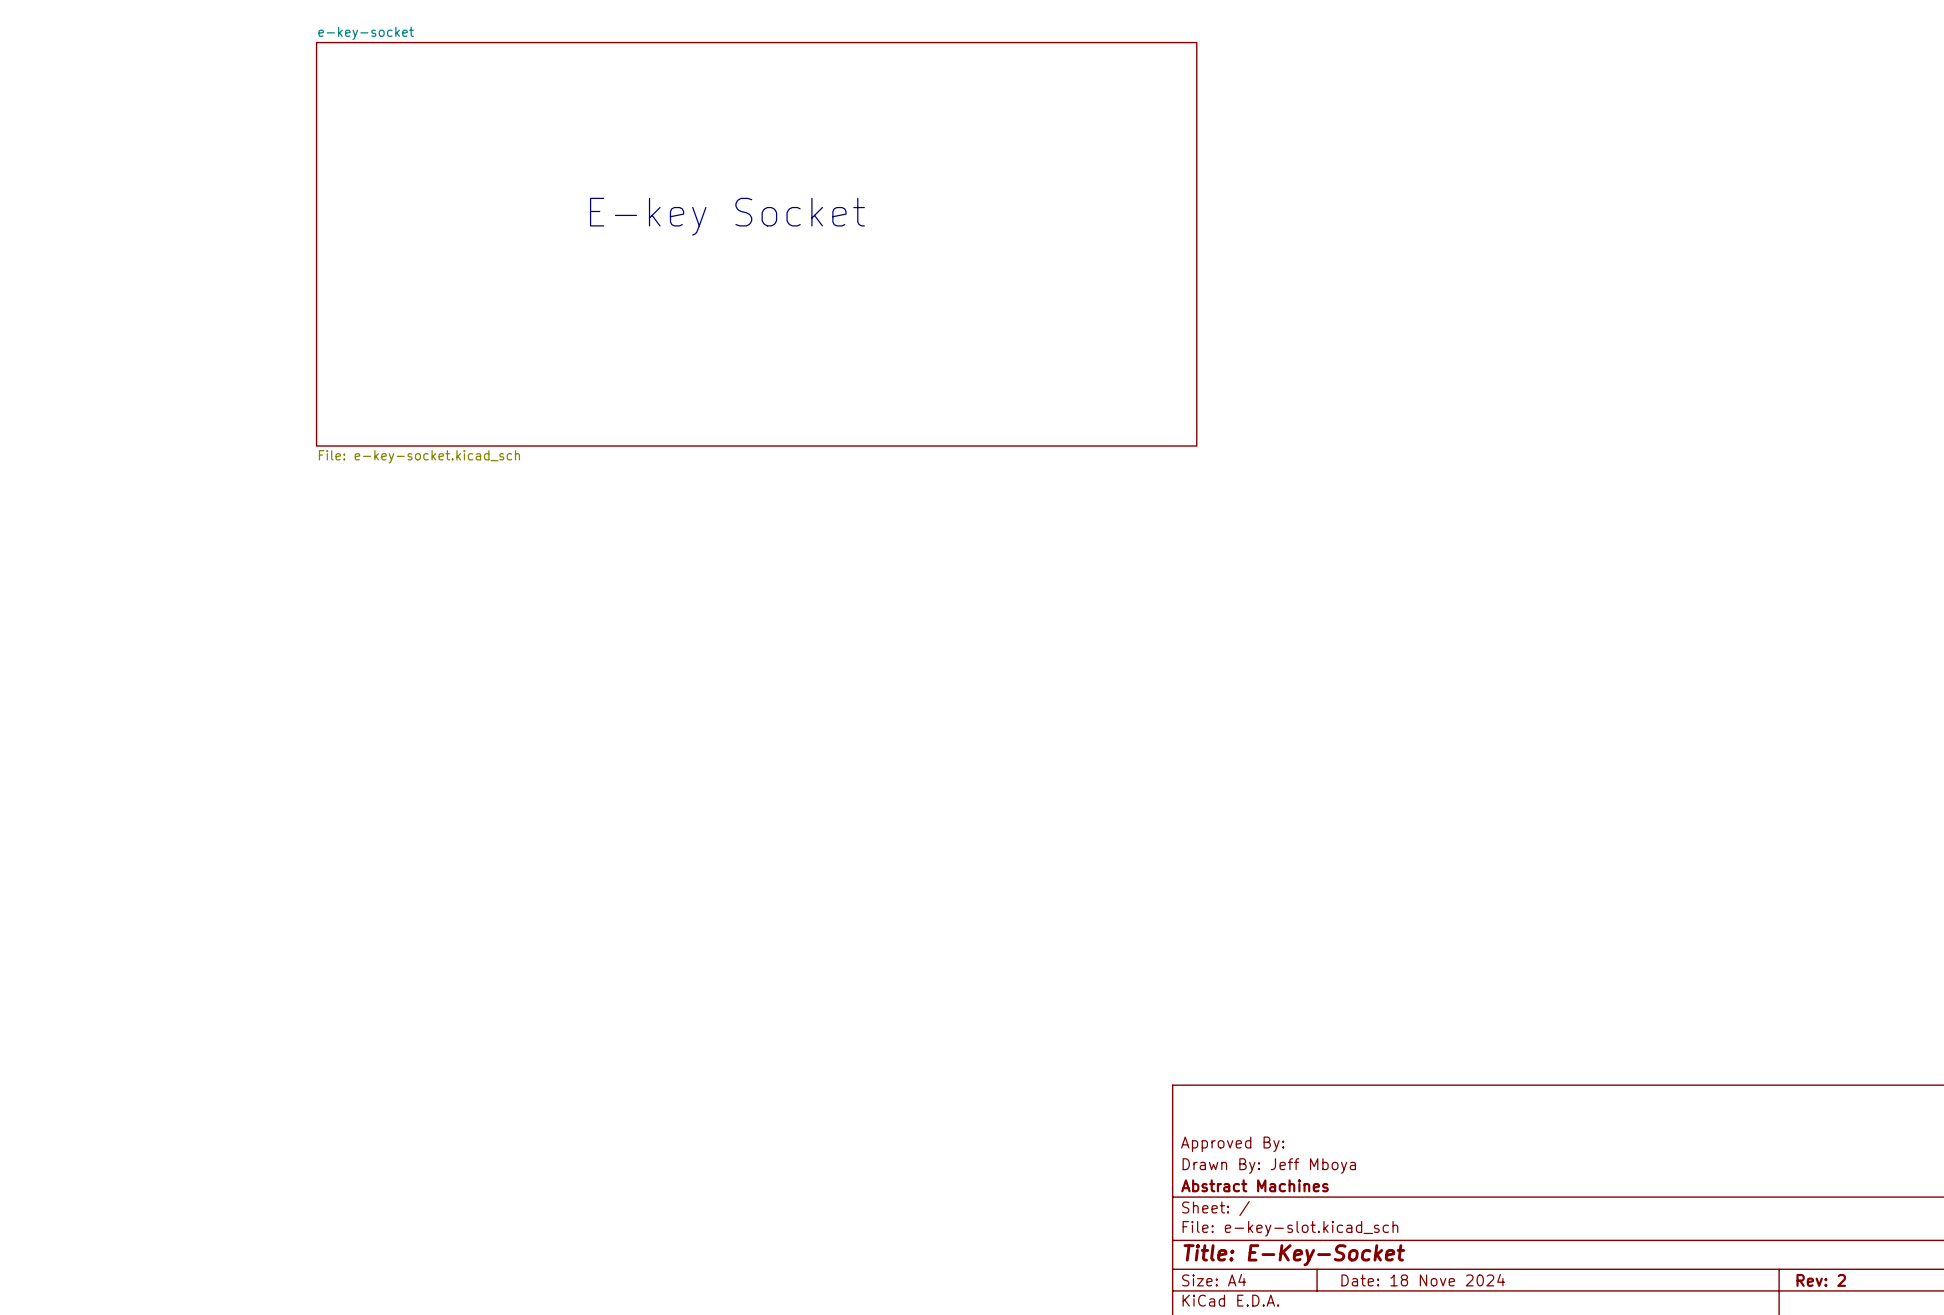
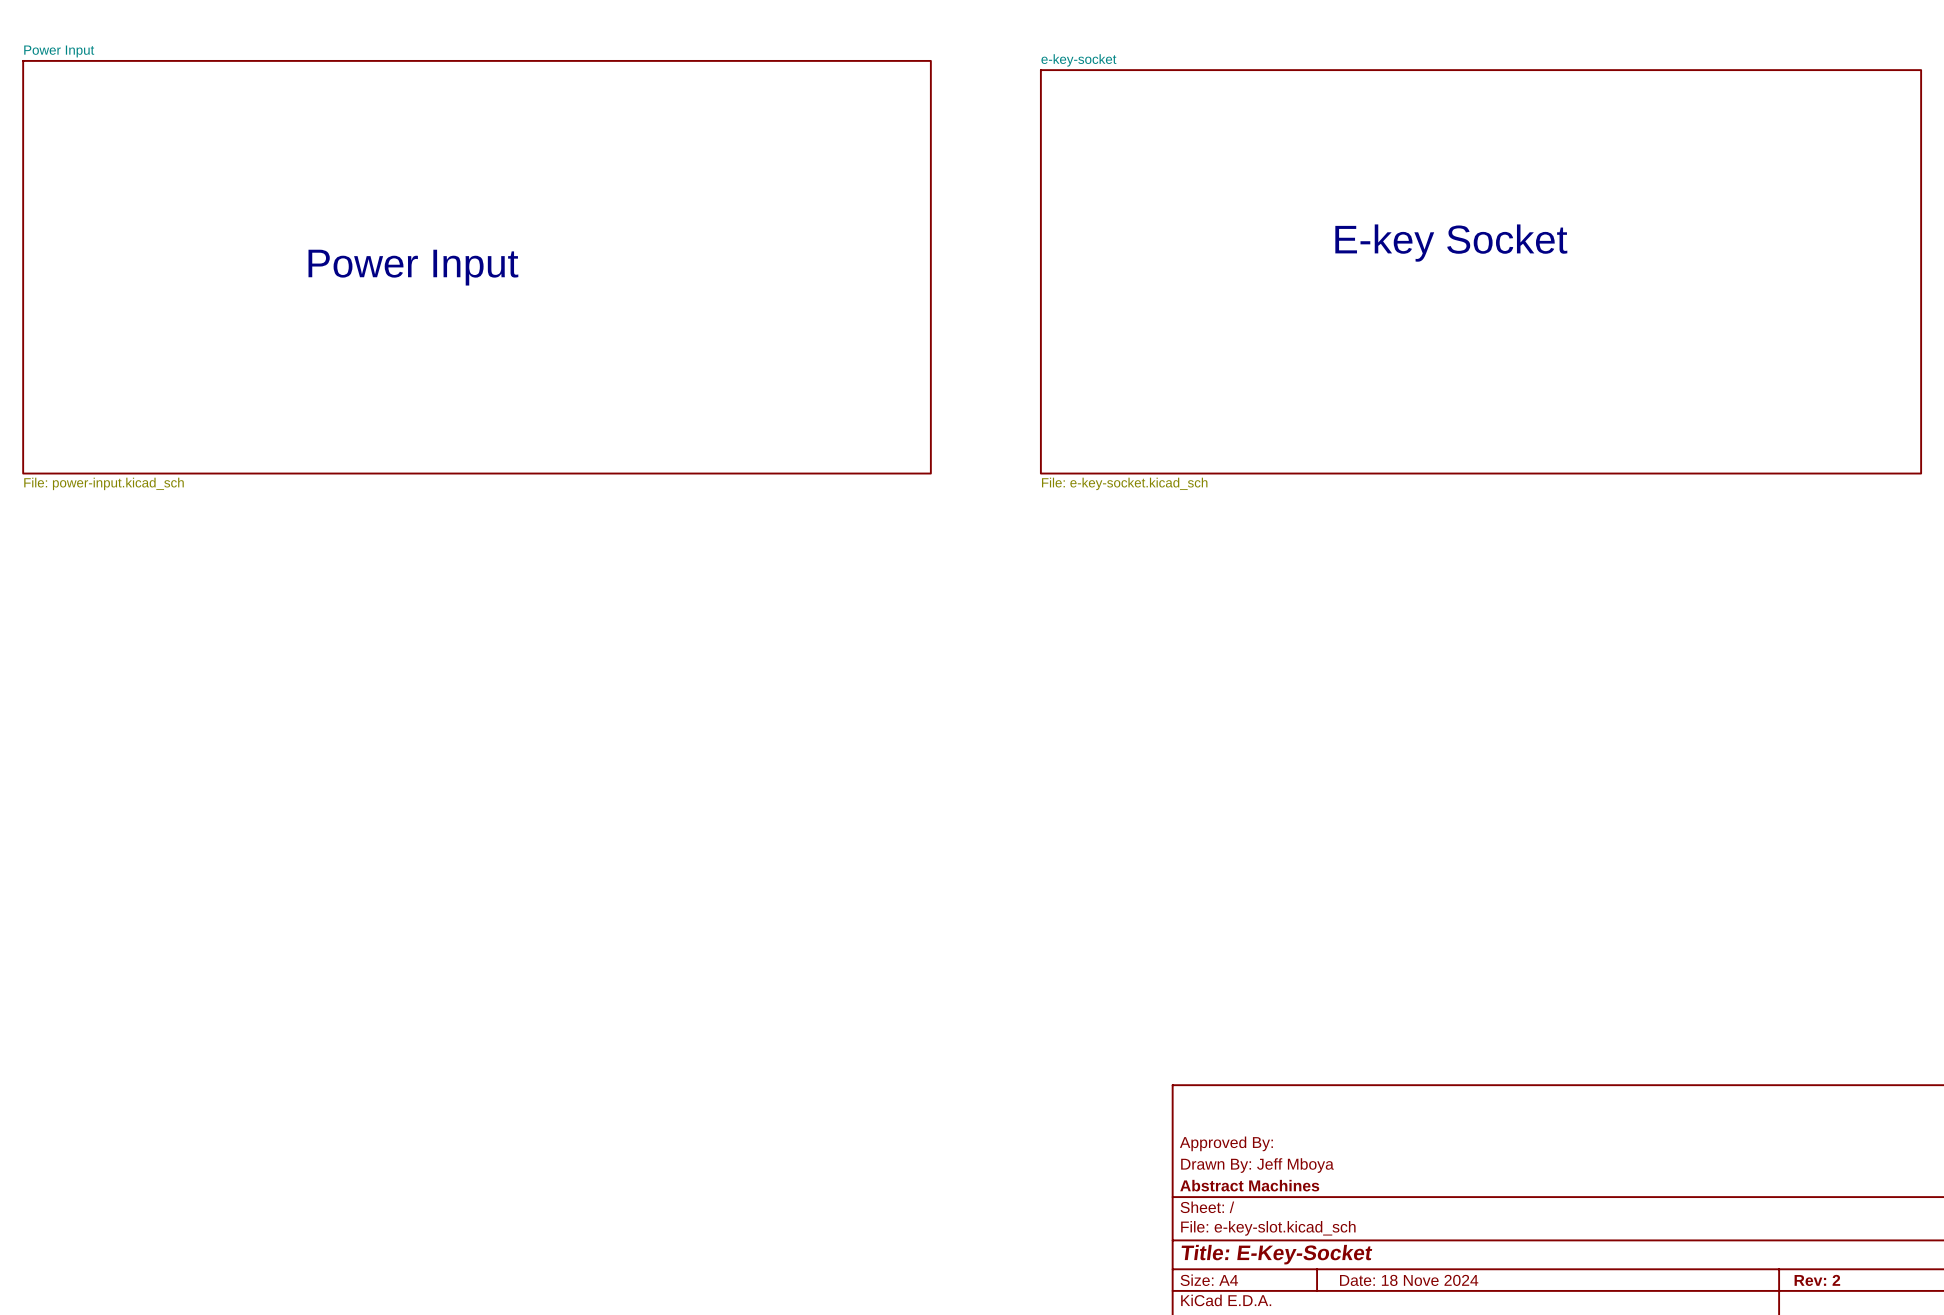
text: E-key Socket (727, 216) -> none
sheet e-key-socket: File: e-key-socket.kicad_sch (756, 244) -> none
text: none -> E-key Socket (1451, 243)
sheet Power Input: none -> File: power-input.kicad_sch (477, 267)
text: none -> Power Input (413, 267)
sheet e-key-socket: none -> File: e-key-socket.kicad_sch (1481, 271)

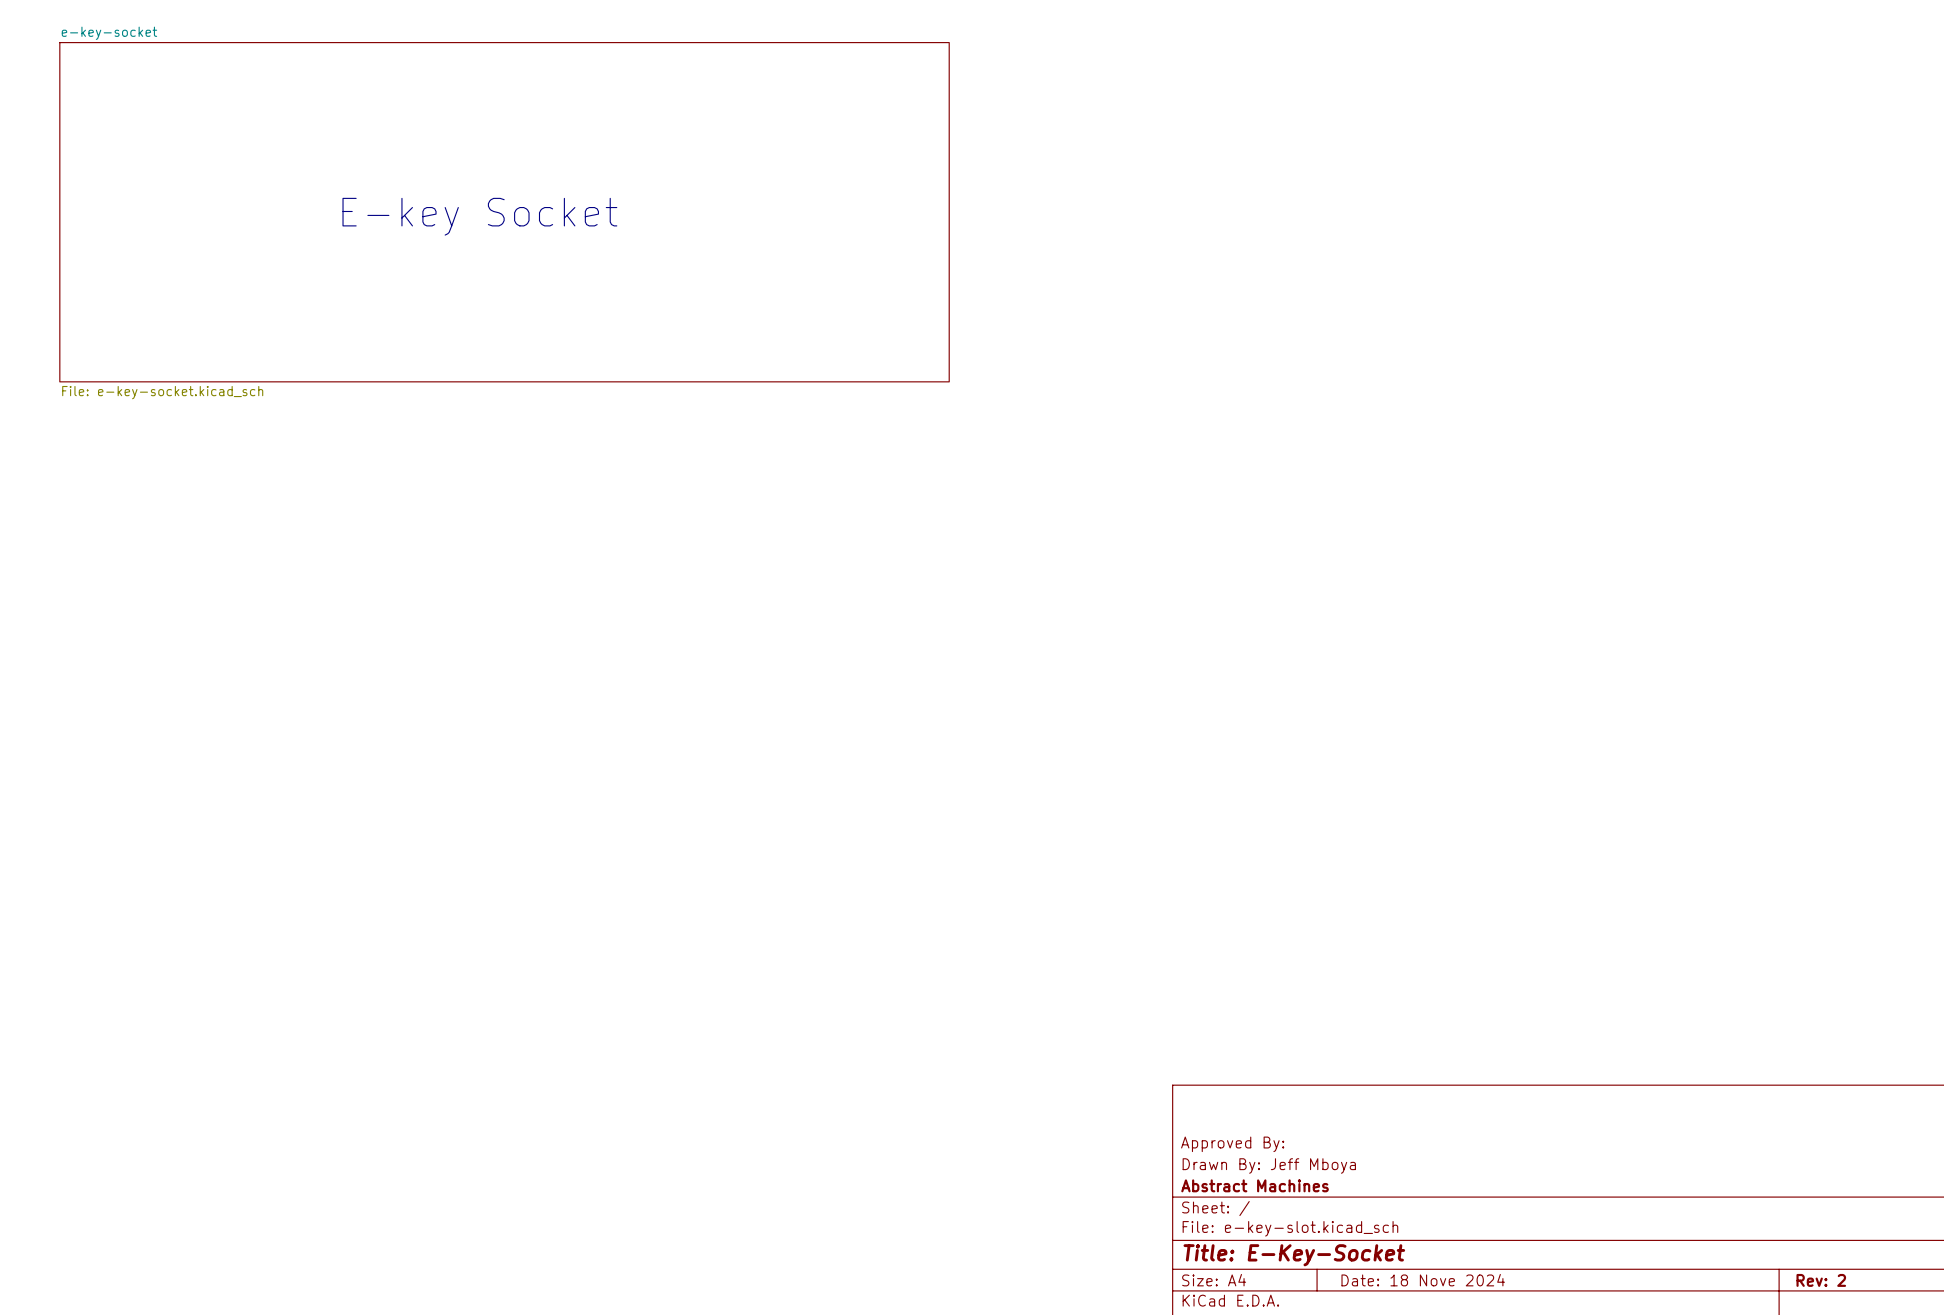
sheet e-key-socket: none -> File: e-key-socket.kicad_sch (504, 212)
text: none -> E-key Socket (479, 216)
text: E-key Socket (1451, 243) -> none
text: Power Input (413, 267) -> none
sheet Power Input: File: power-input.kicad_sch (477, 267) -> none
sheet e-key-socket: File: e-key-socket.kicad_sch (1481, 271) -> none

